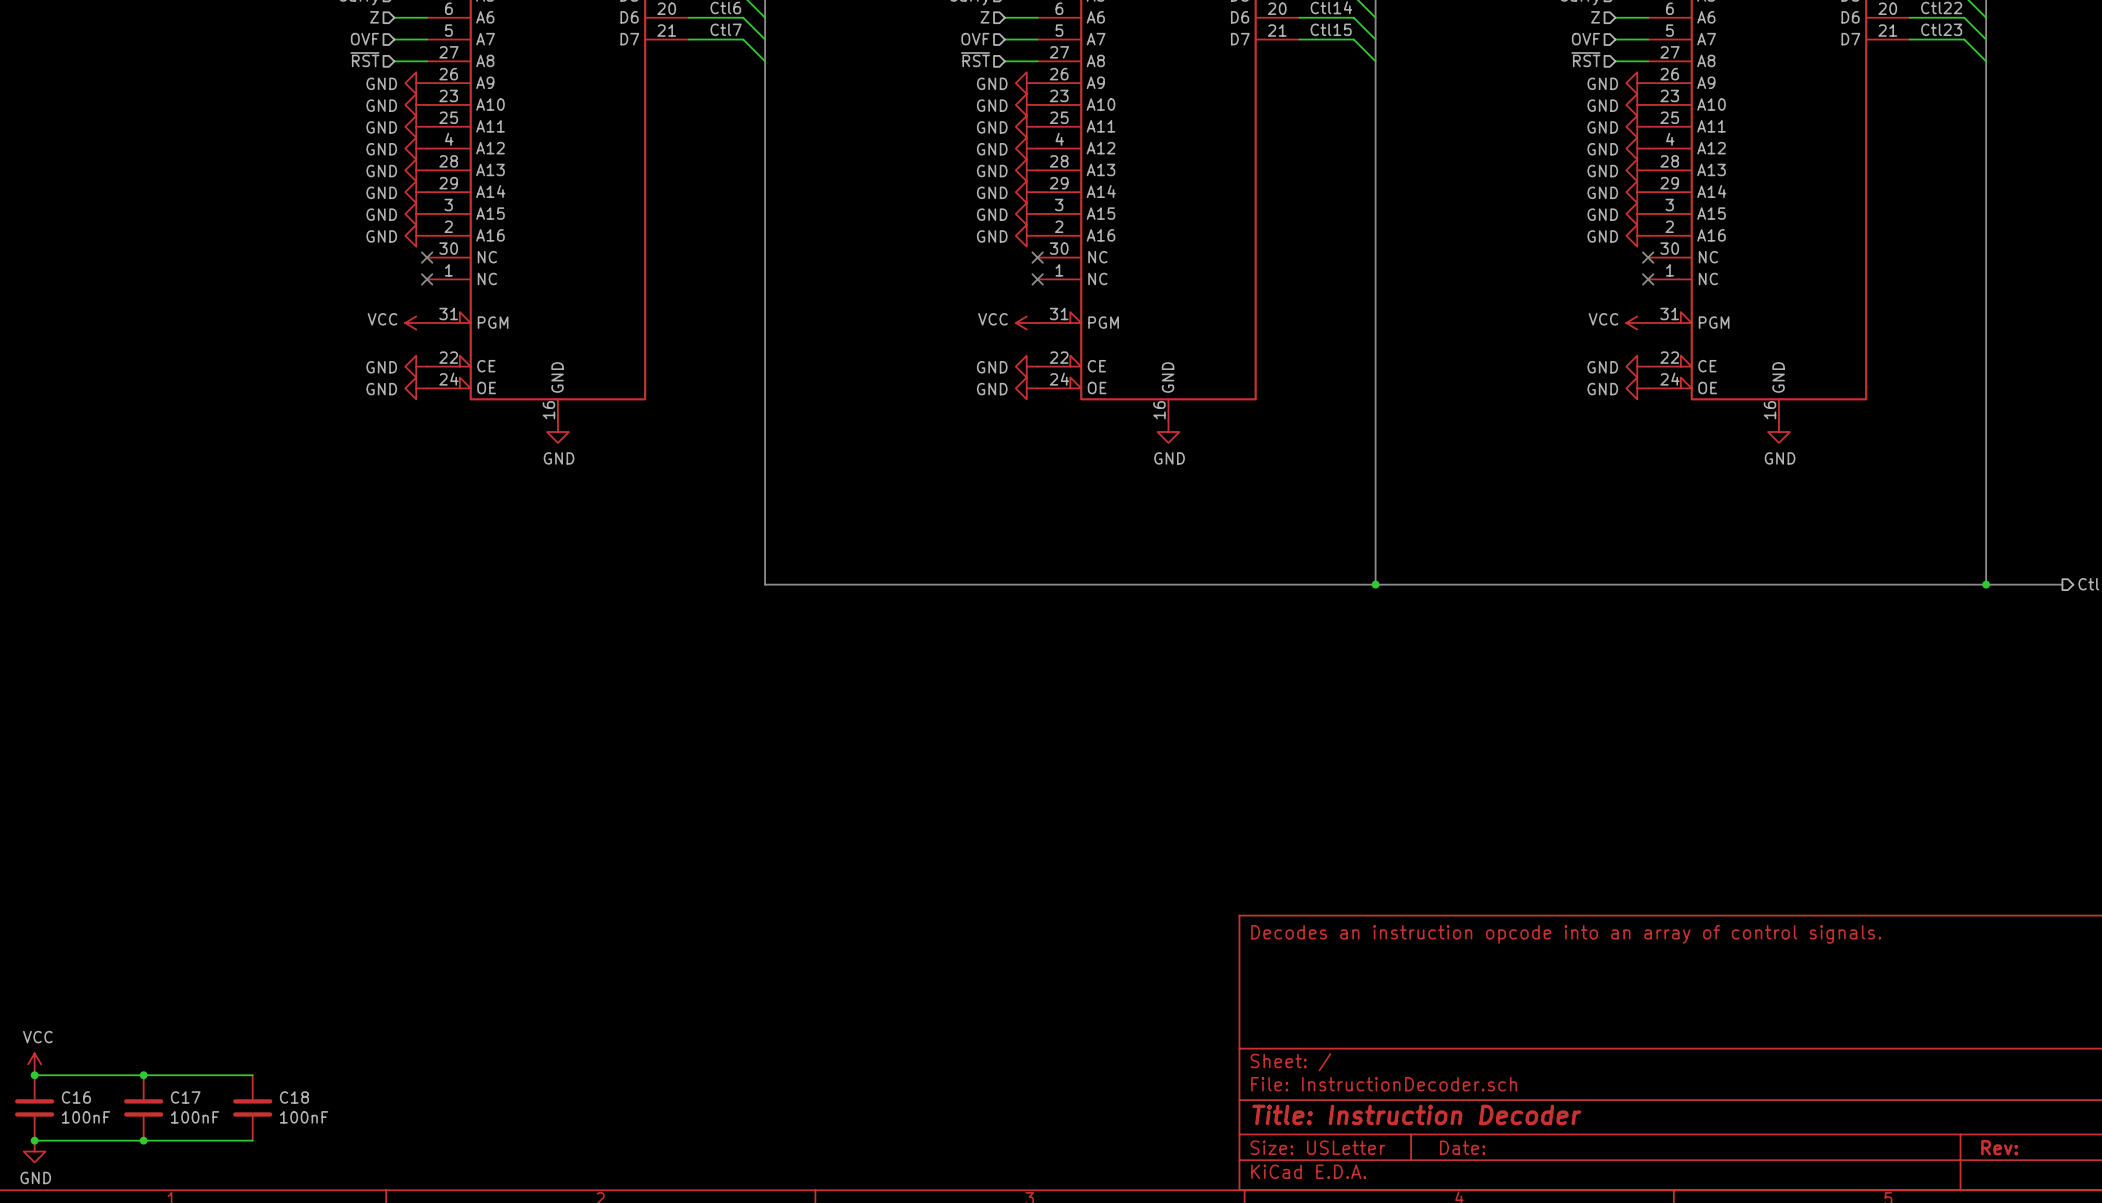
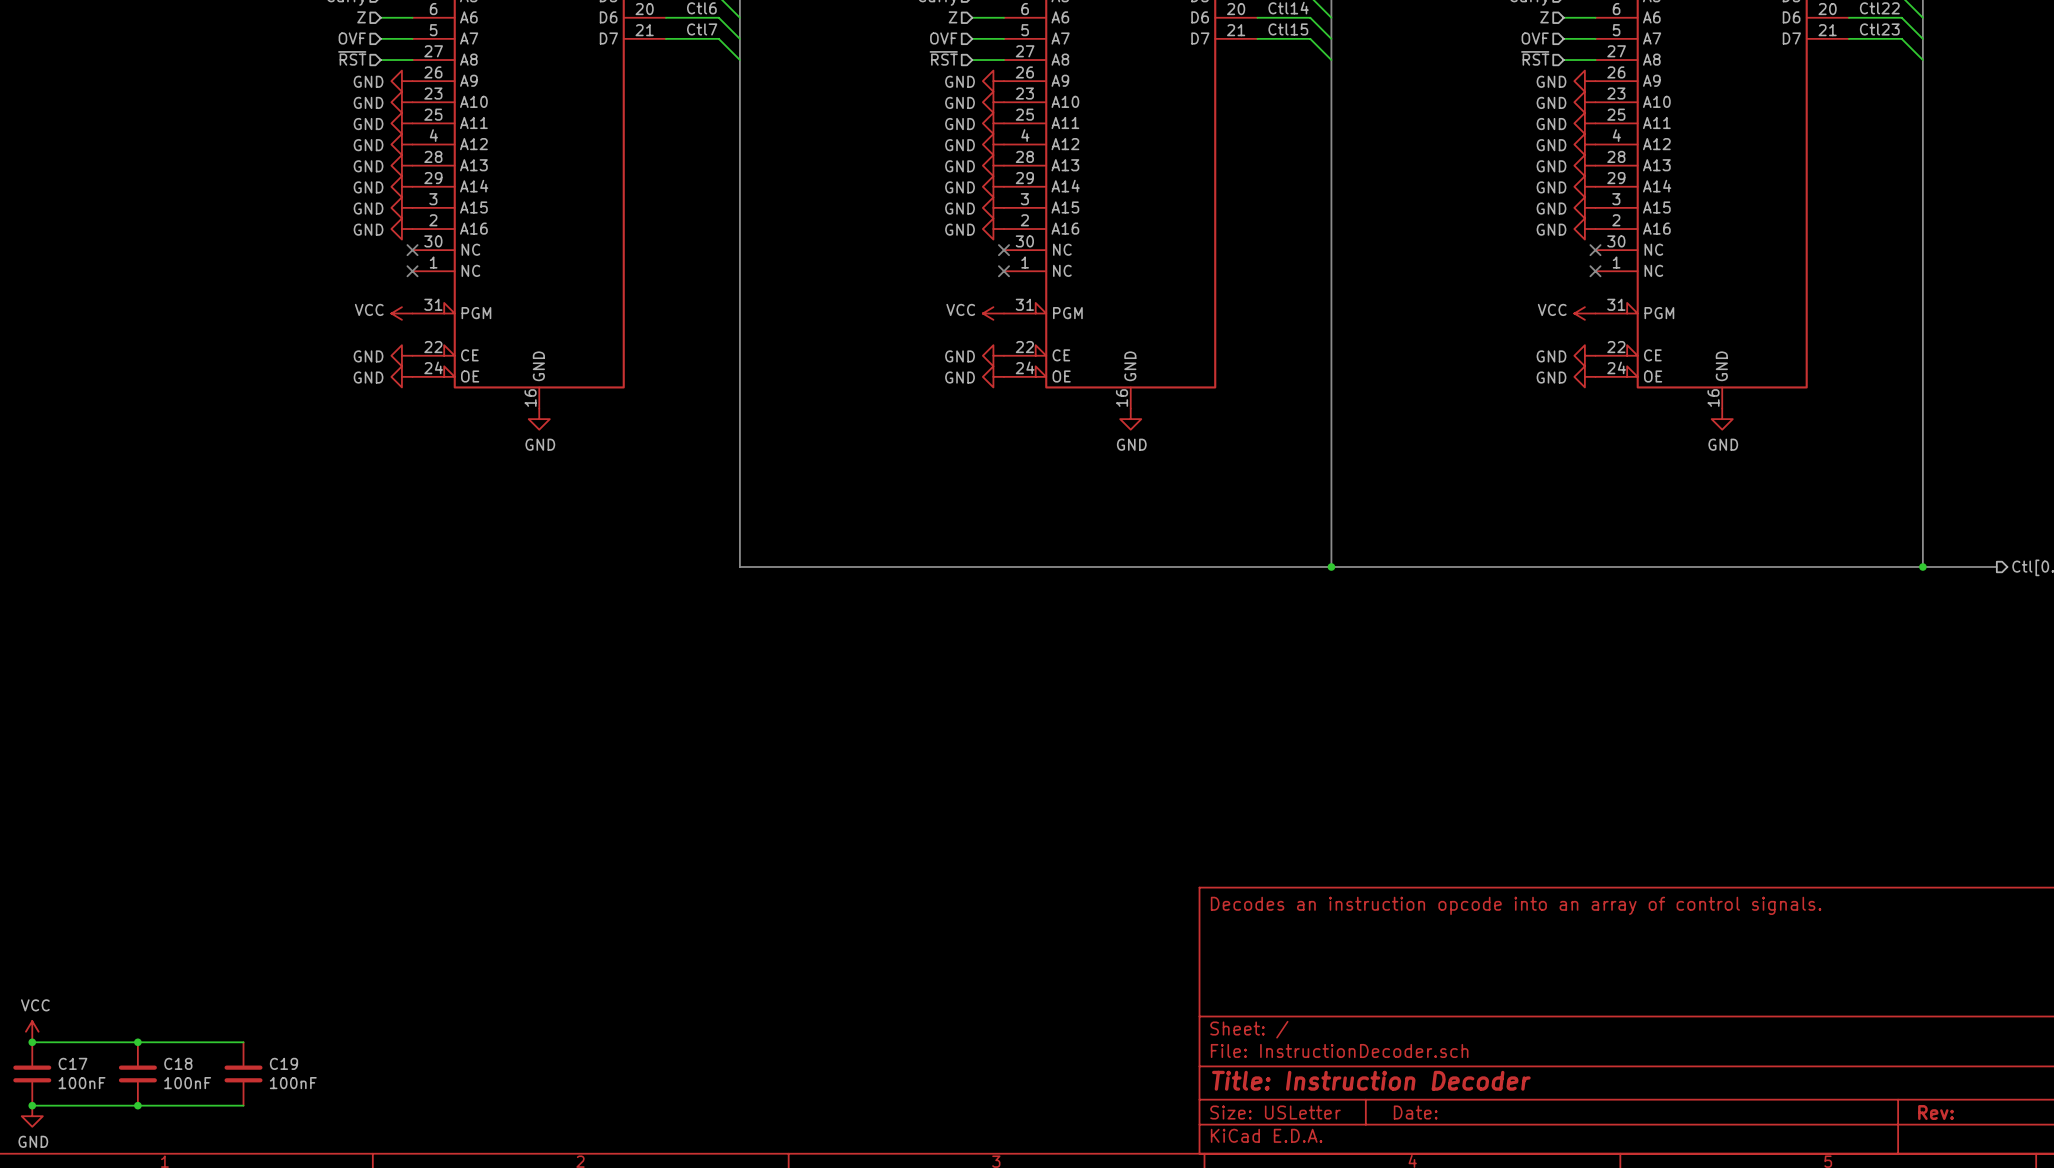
C16 name: C16 (76, 1097) -> C17 (72, 1063)
C17 name: C17 (185, 1097) -> C18 (178, 1063)
C18 name: C18 (294, 1097) -> C19 (283, 1063)

